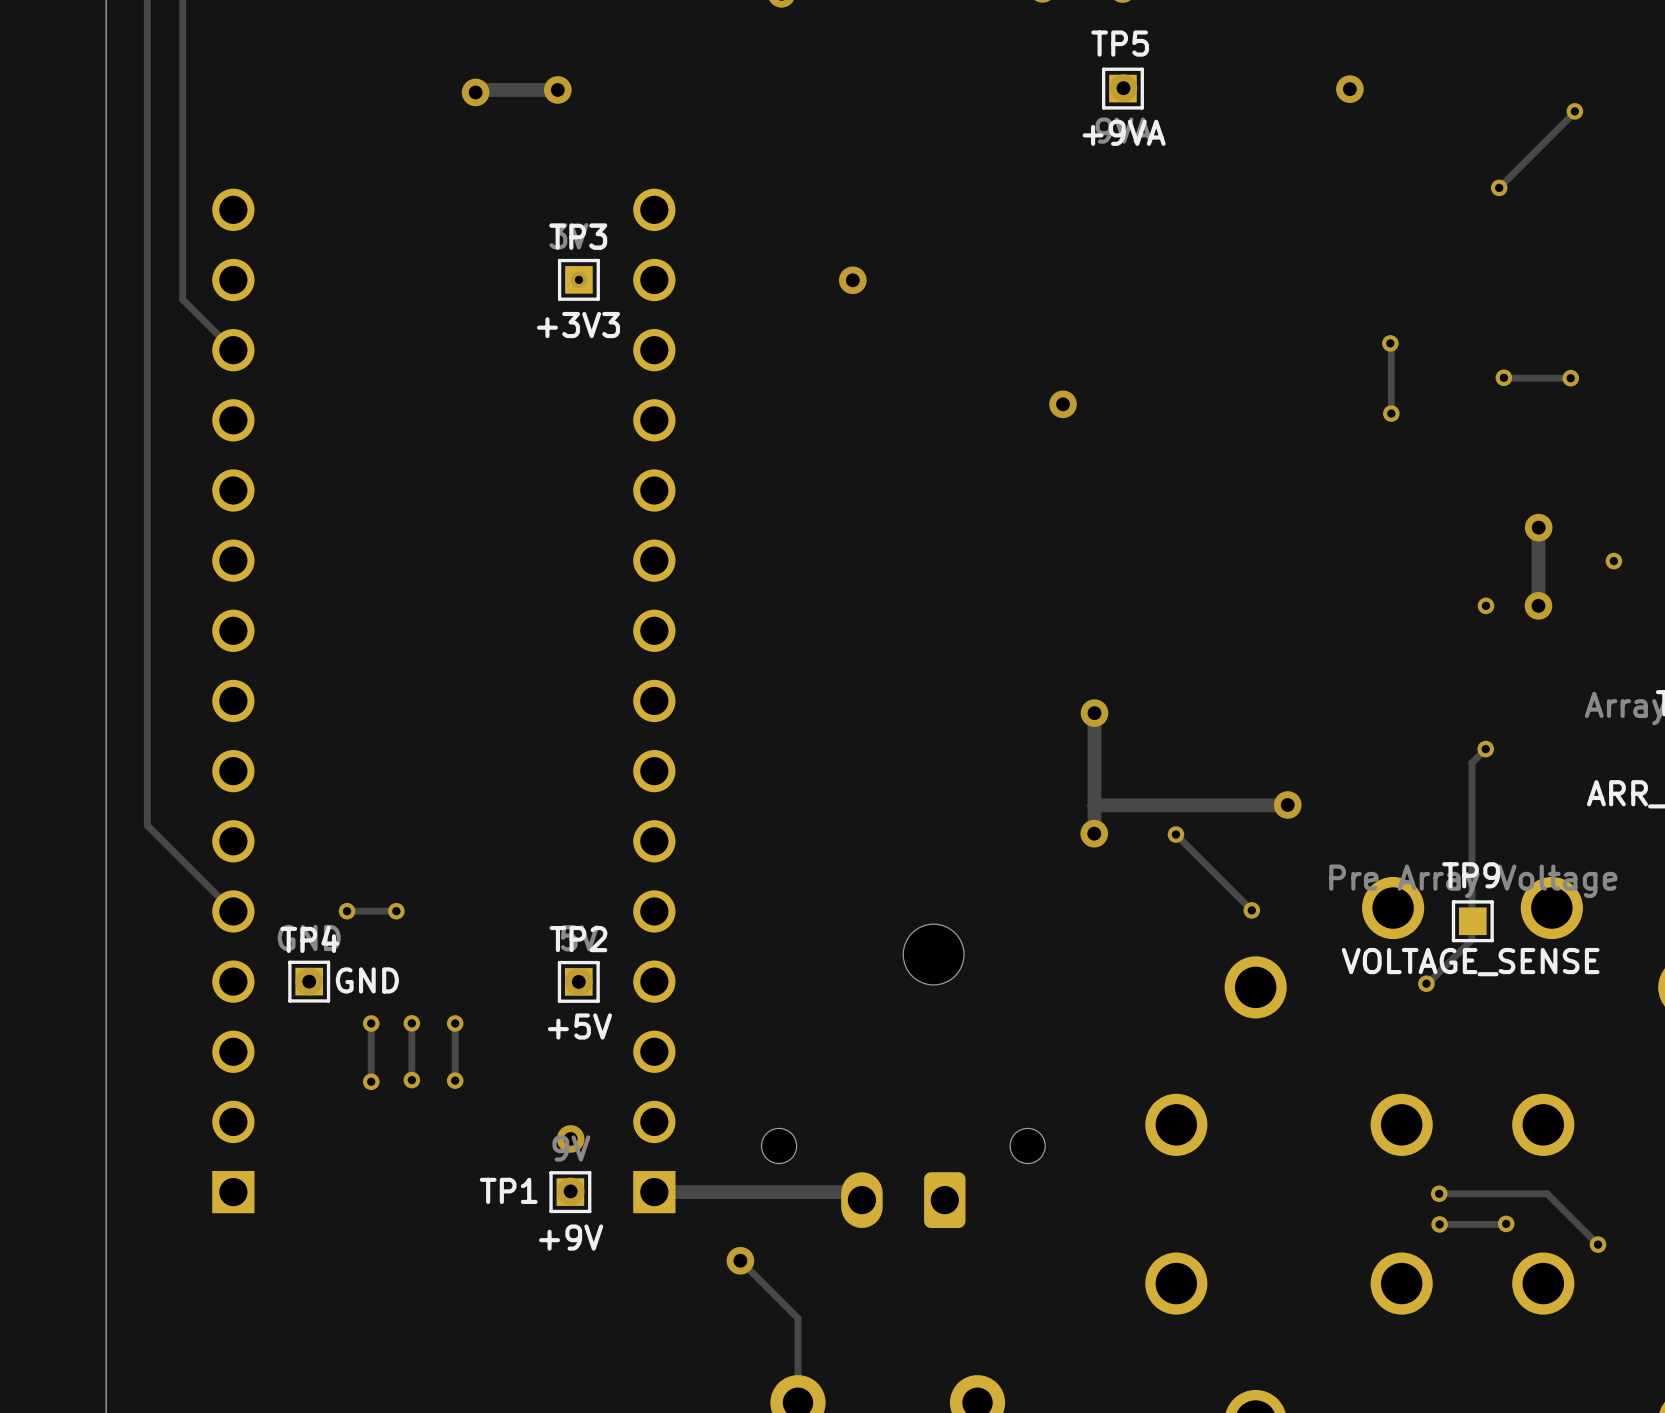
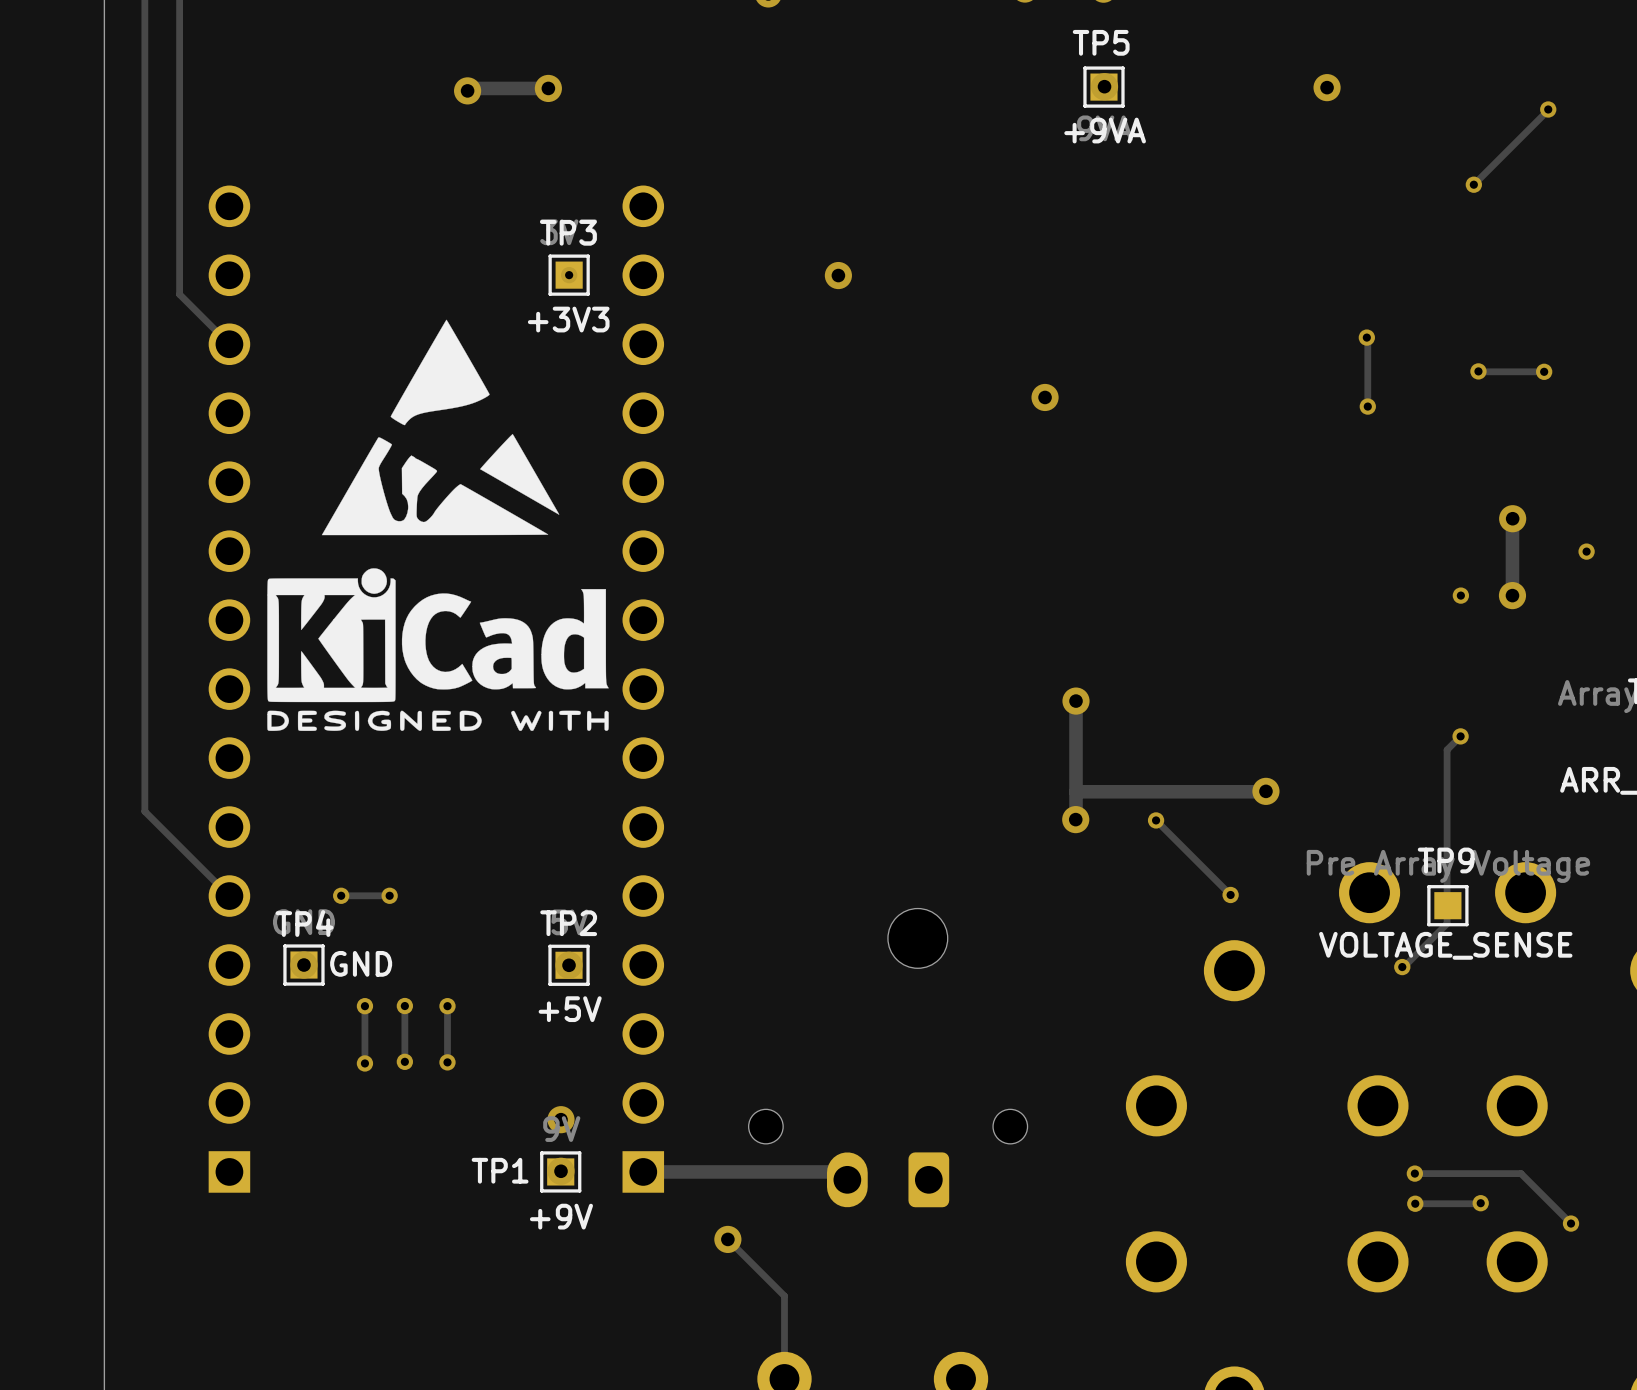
drawing: none -> [321, 319, 560, 536]
drawing: none -> [267, 568, 609, 731]

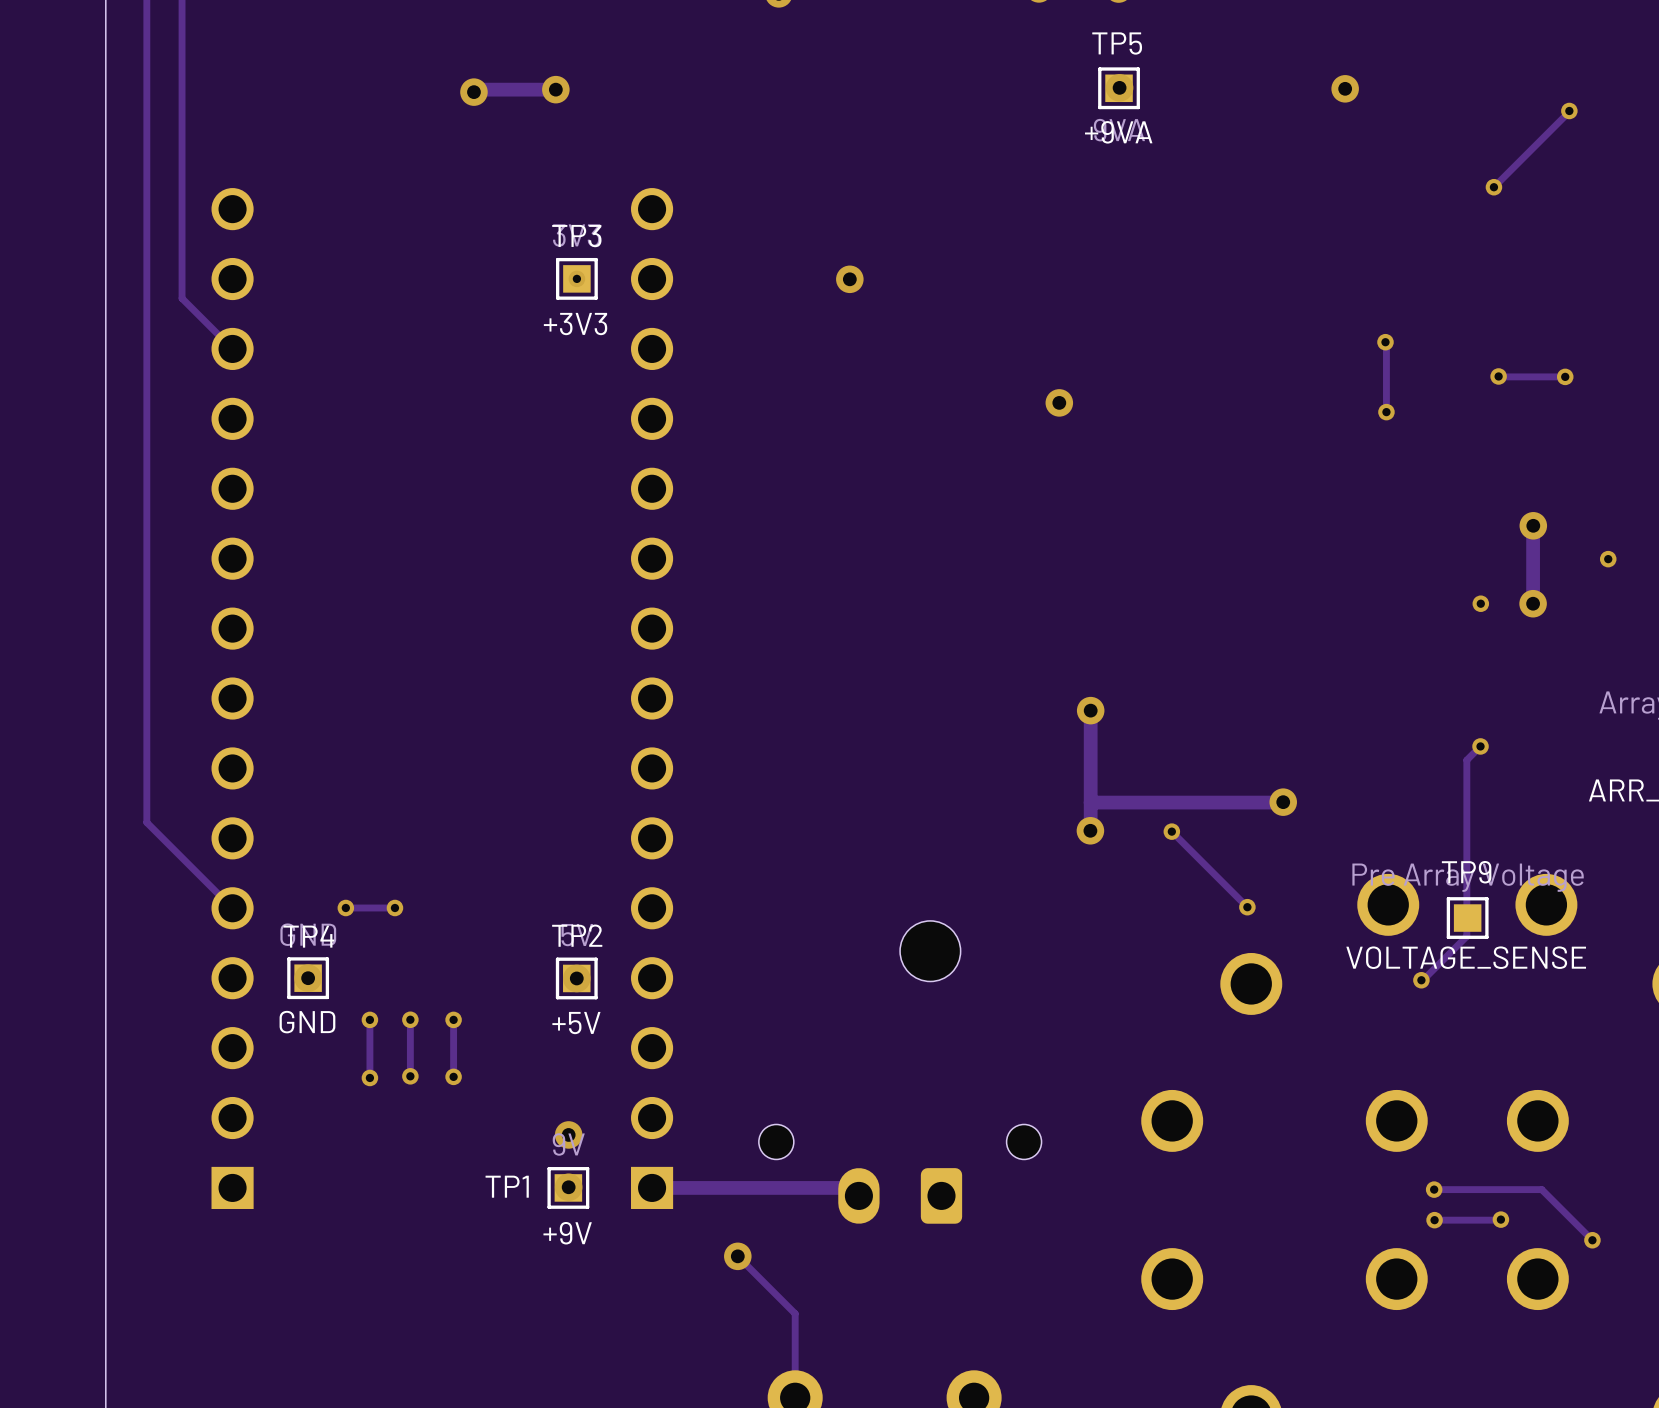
drawing: [321, 319, 560, 536] -> none
drawing: [267, 568, 609, 731] -> none
text position: GND (361, 963) -> GND (307, 1022)

